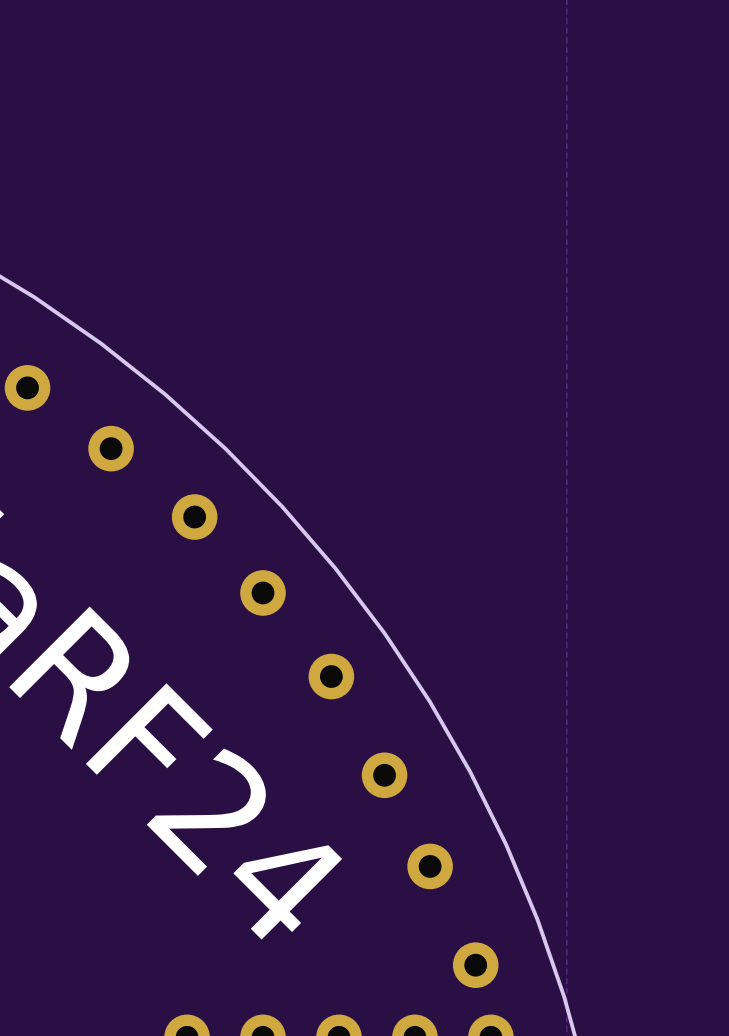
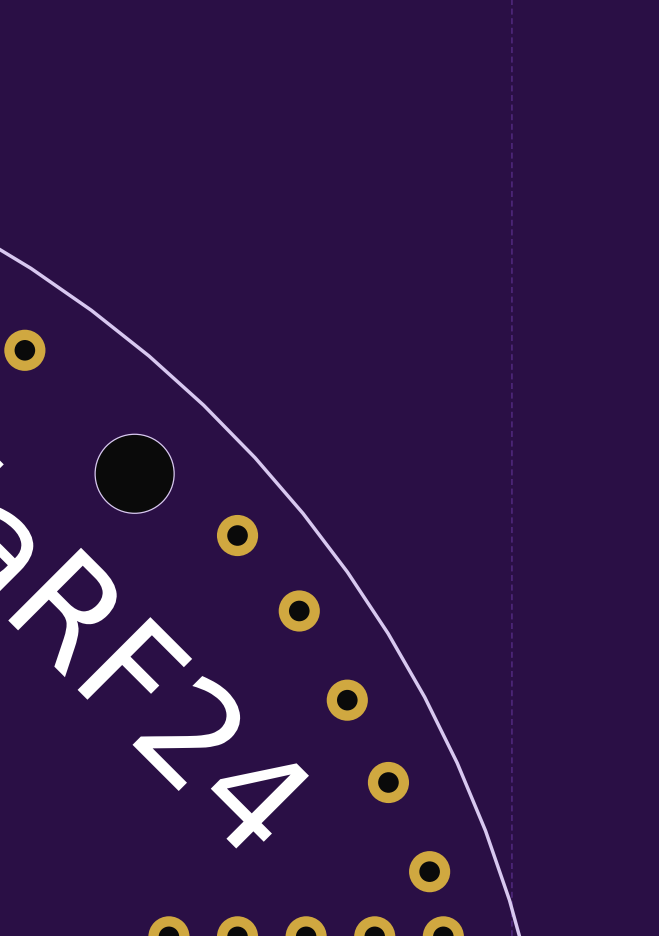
via: (111, 448) -> none
via: (194, 517) -> none
part: none -> (134, 473)

